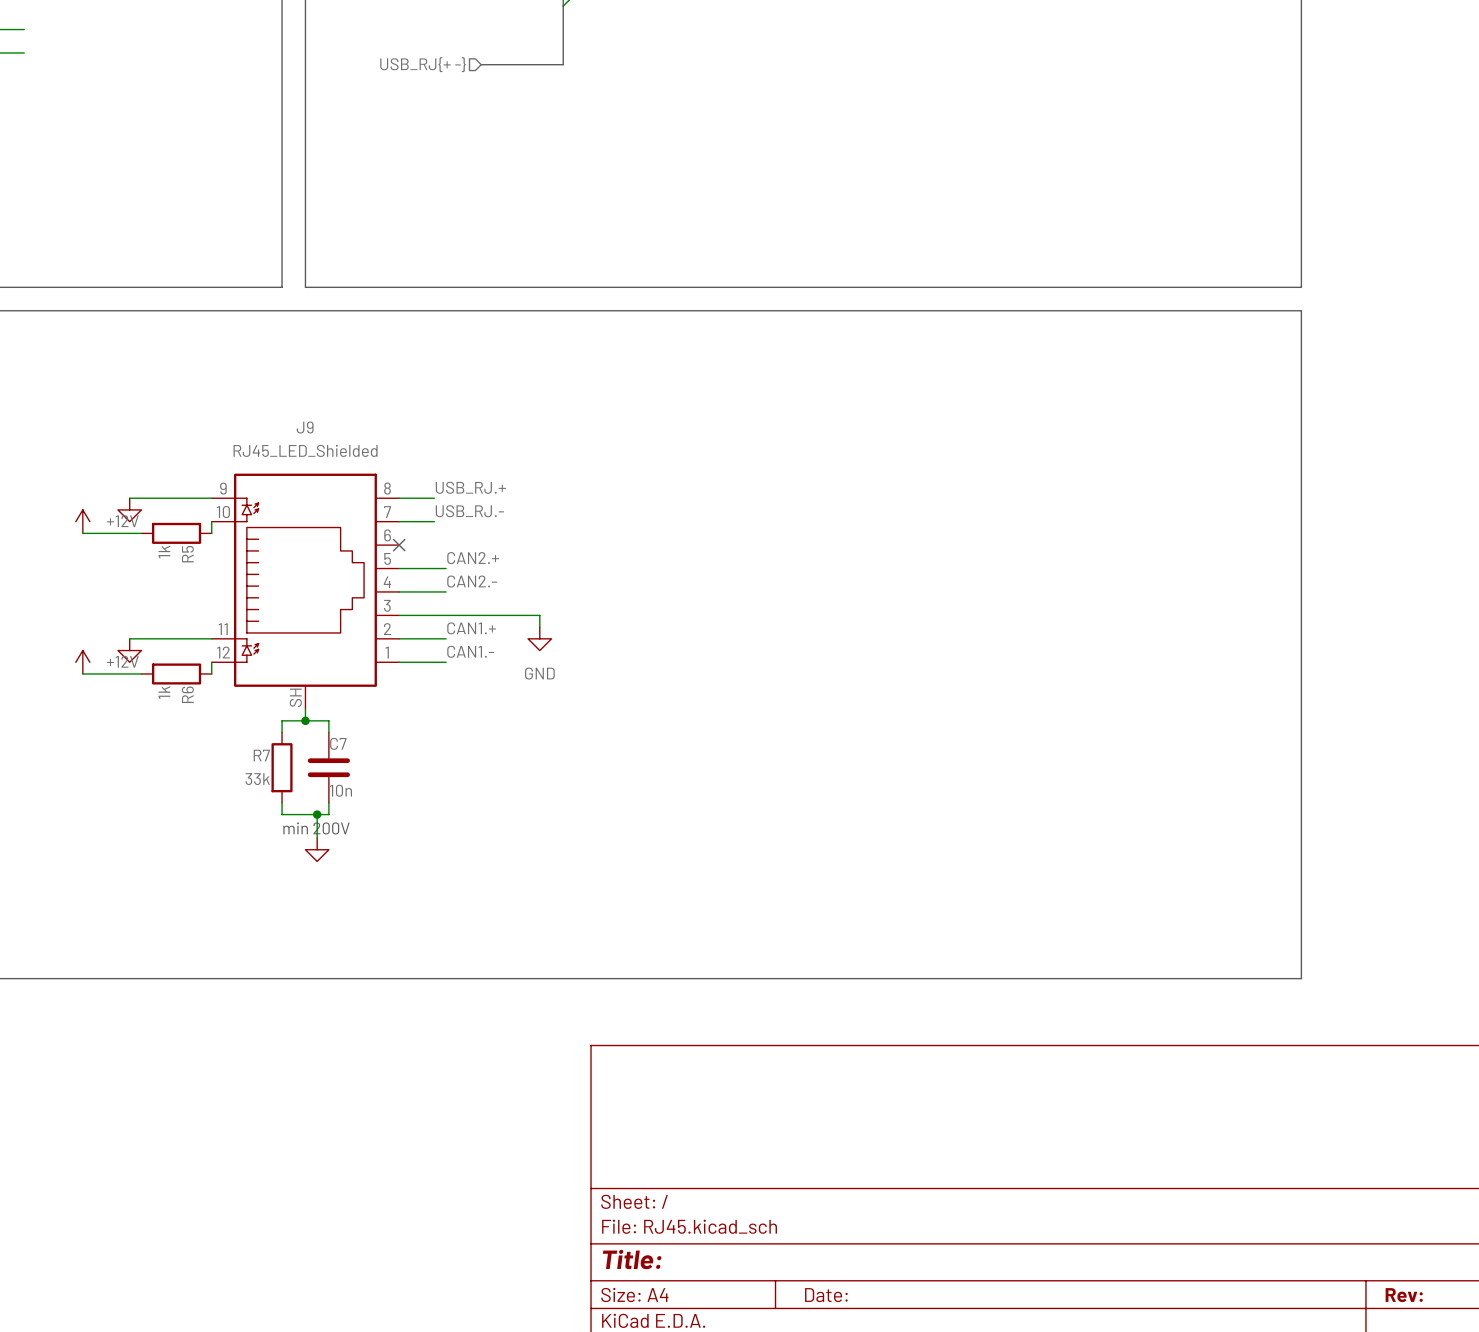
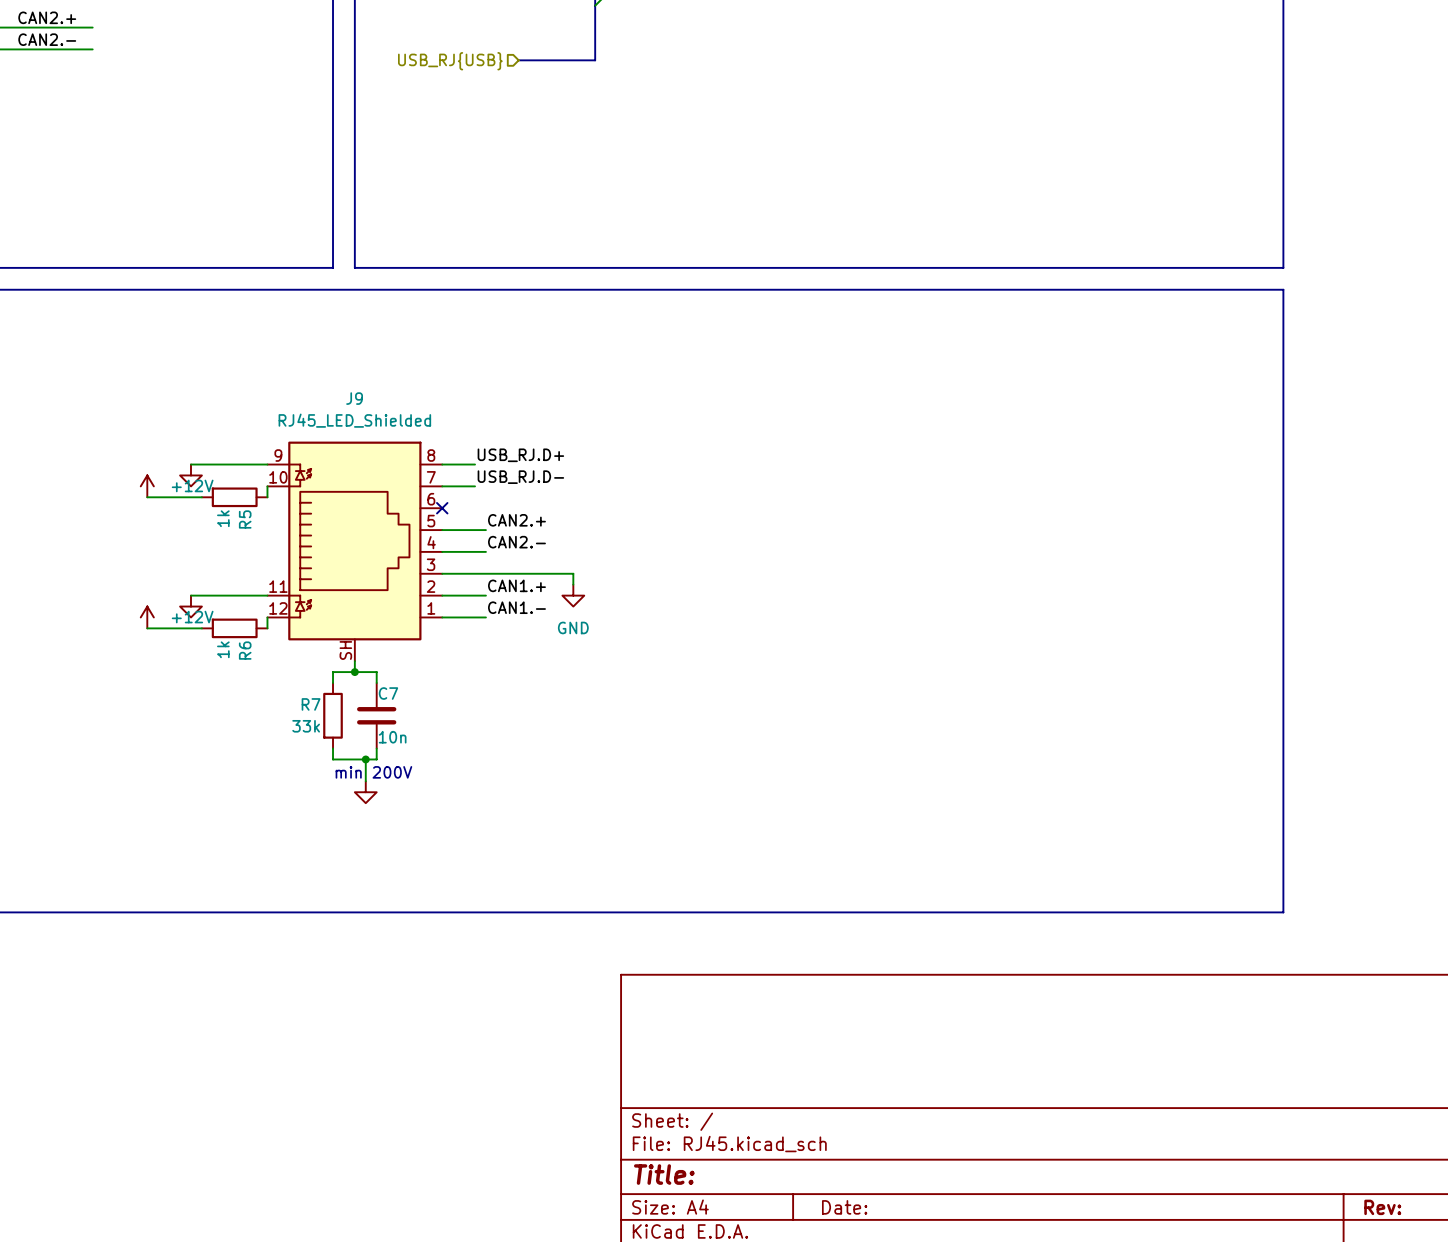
hierarchical label: USB_RJ{+ -} (423, 64) -> USB_RJ{USB} (450, 61)
label: USB_RJ.+ (470, 487) -> USB_RJ.D+ (520, 455)
label: USB_RJ.- (469, 511) -> USB_RJ.D- (520, 477)

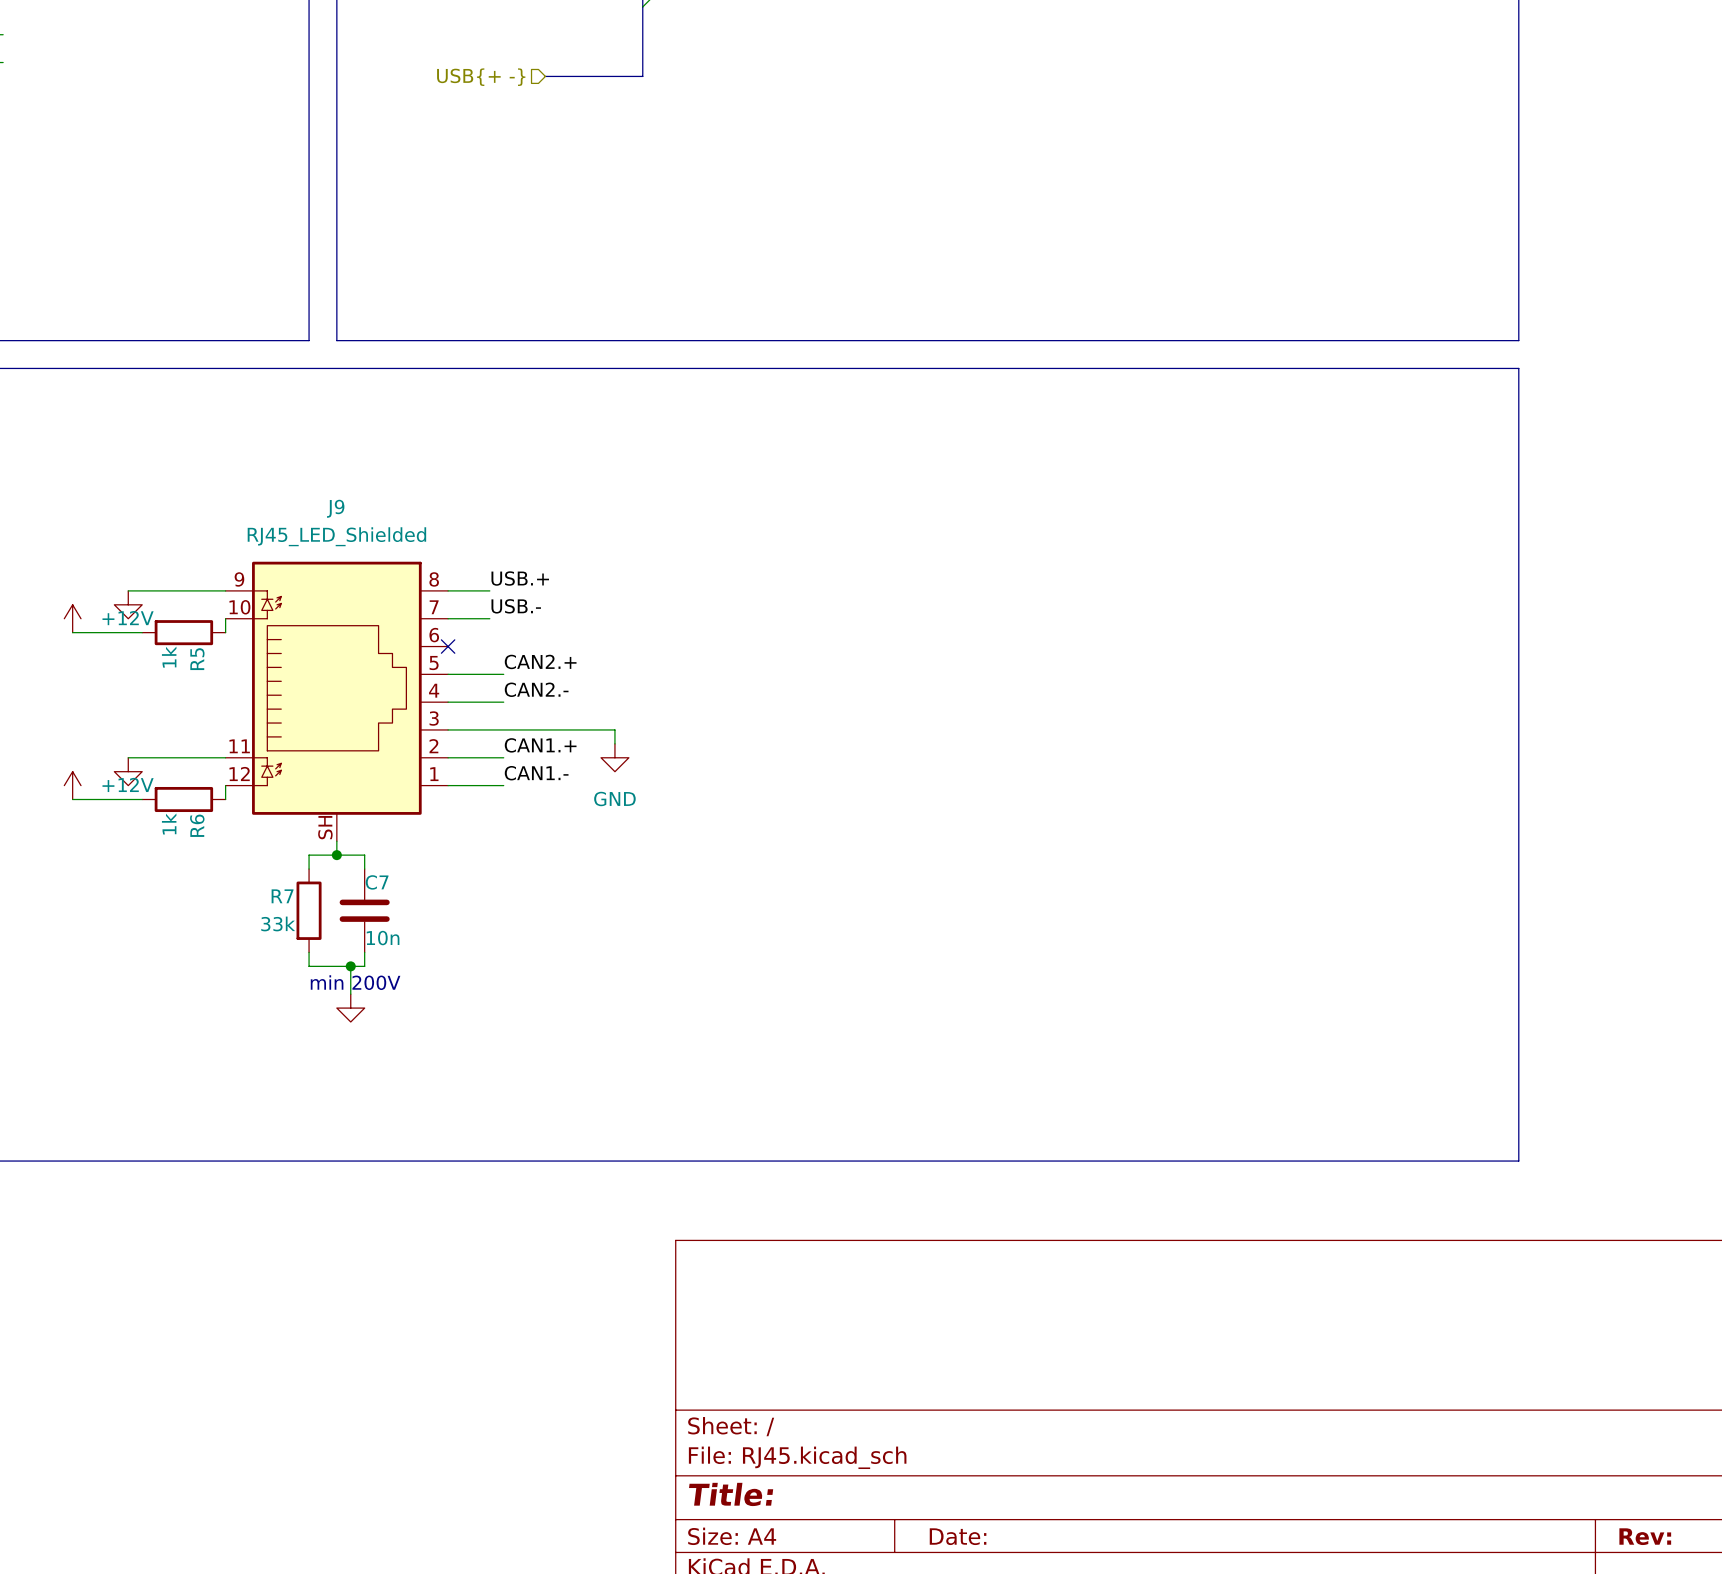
hierarchical label: USB_RJ{USB} (450, 61) -> USB{+ -} (481, 77)
label: USB_RJ.D+ (520, 455) -> USB.+ (520, 578)
label: USB_RJ.D- (520, 477) -> USB.- (516, 606)

